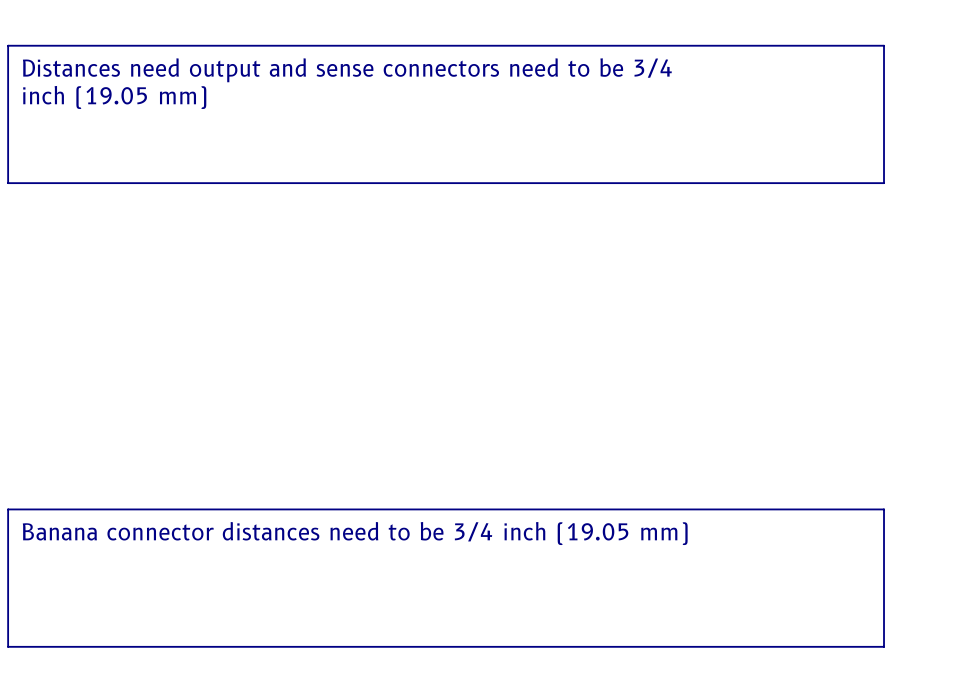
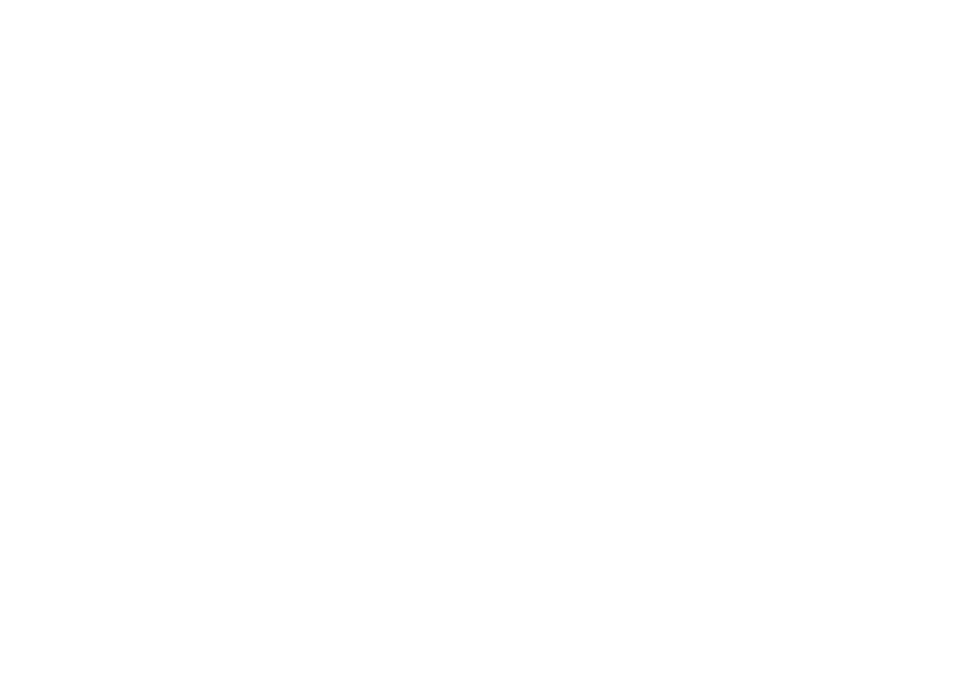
line: (8, 45) (8, 183) (884, 183) (884, 45) (8, 45) -> none
text: Distances need output and sense connectors need to be 3/4 (347, 70) -> none
text: inch (19.05 mm) (114, 97) -> none
line: (8, 509) (884, 509) (884, 646) (8, 646) (8, 509) -> none
text: Banana connector distances need to be 3/4 inch (19.05 mm) (355, 533) -> none

